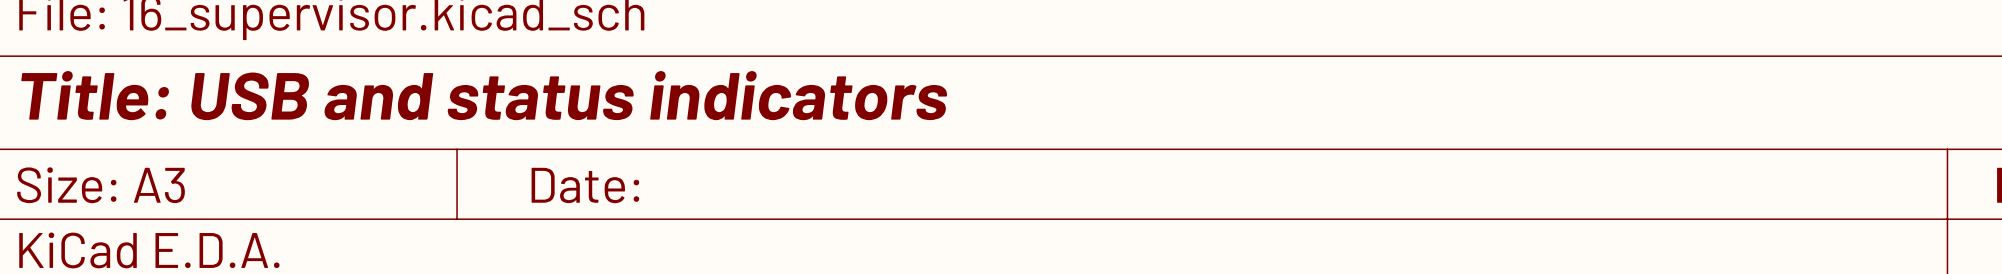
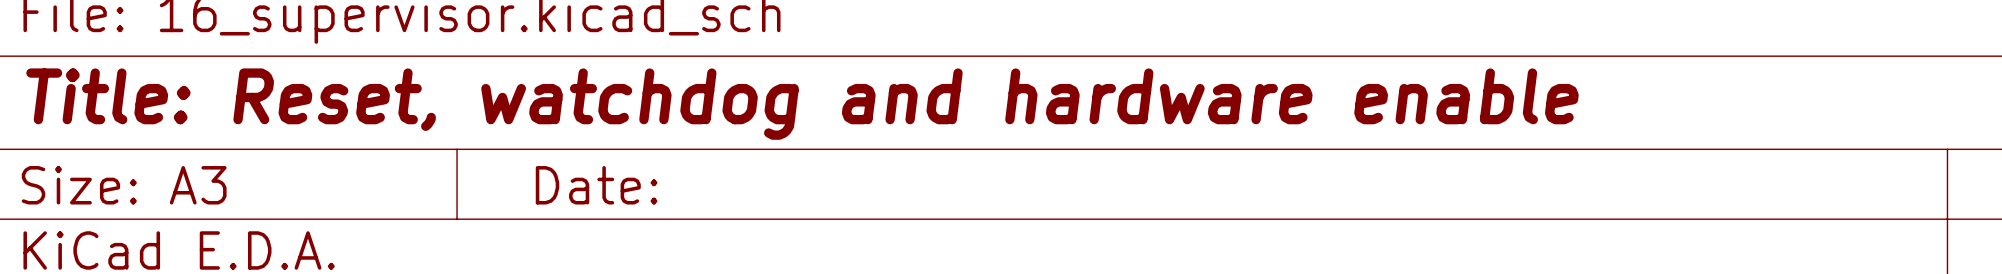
title block: Title: USB and status indicators (484, 95) -> Title: Reset, watchdog and hardware enable (802, 104)

